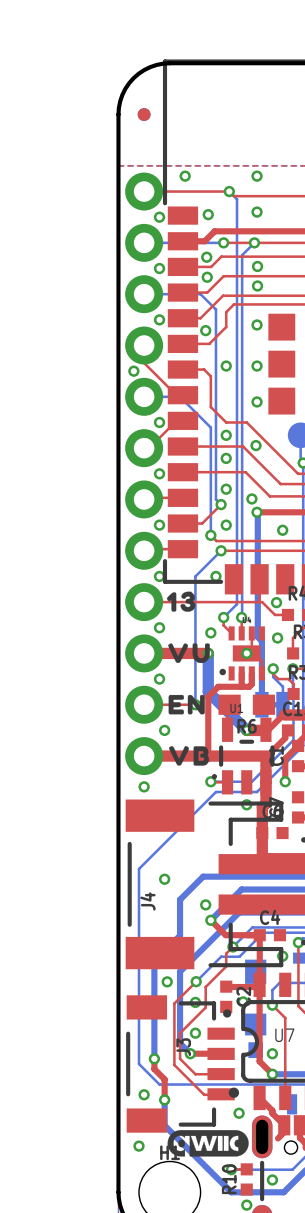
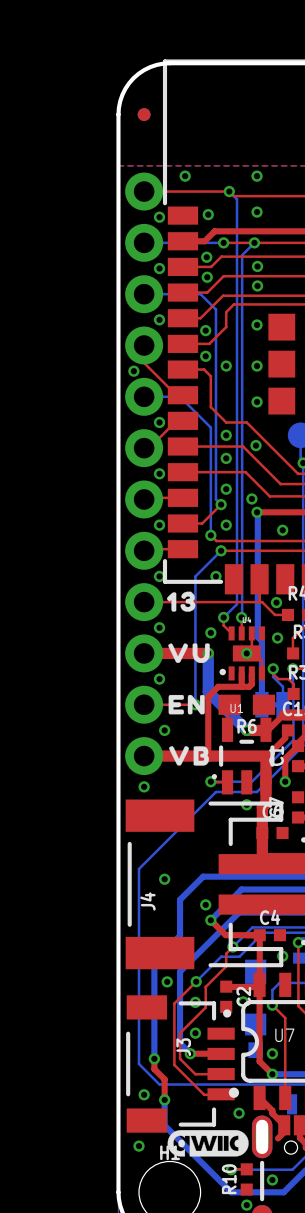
via: none -> (205, 356)

